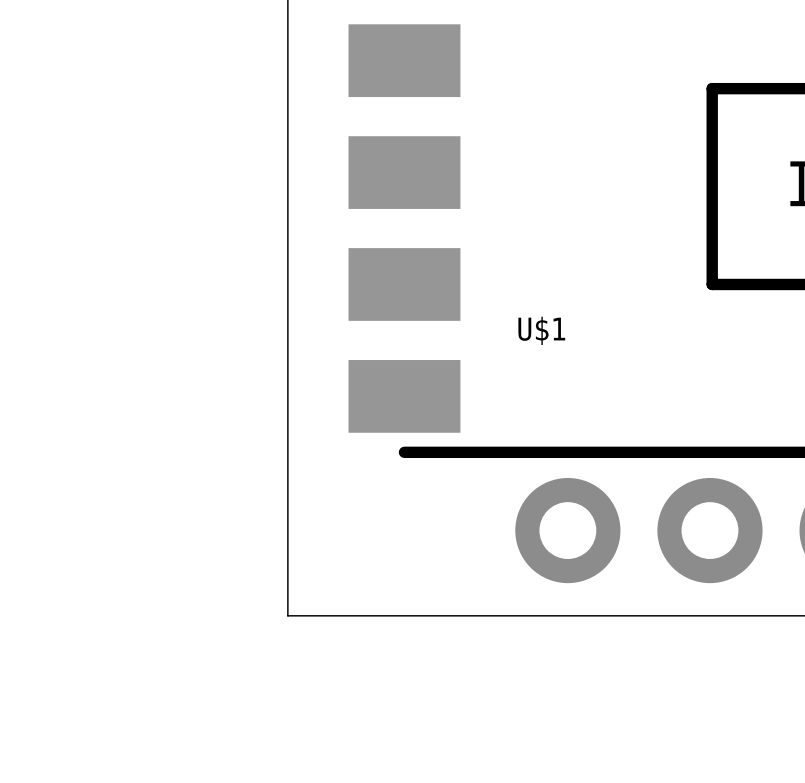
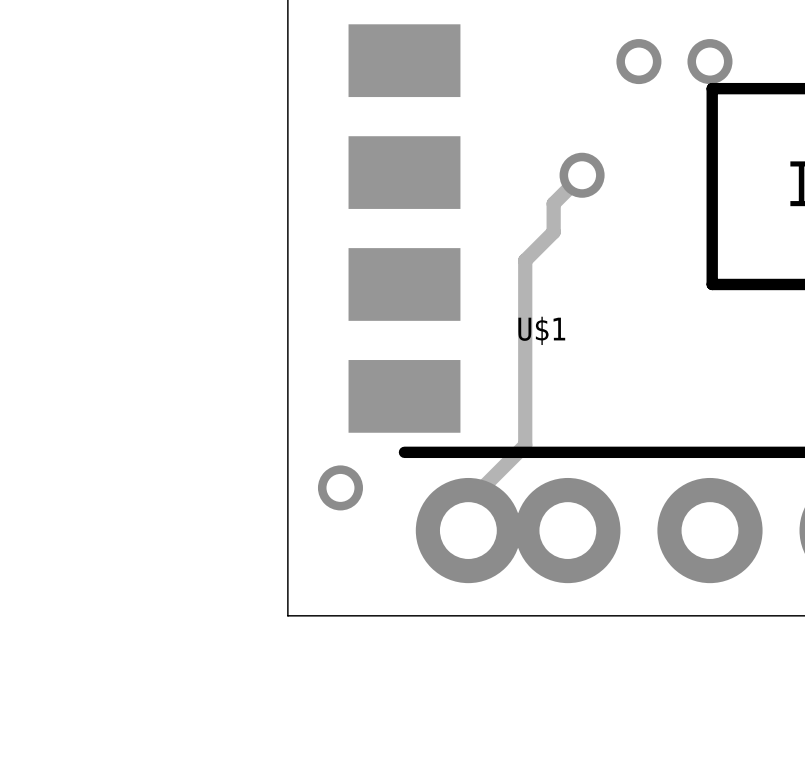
via: none -> (638, 61)
via: none -> (709, 61)
track: none -> (582, 175) (553, 203) (553, 232) (525, 260) (525, 445) (468, 502) (468, 530)
via: none -> (582, 175)
via: none -> (340, 487)
part: none -> (468, 530)

